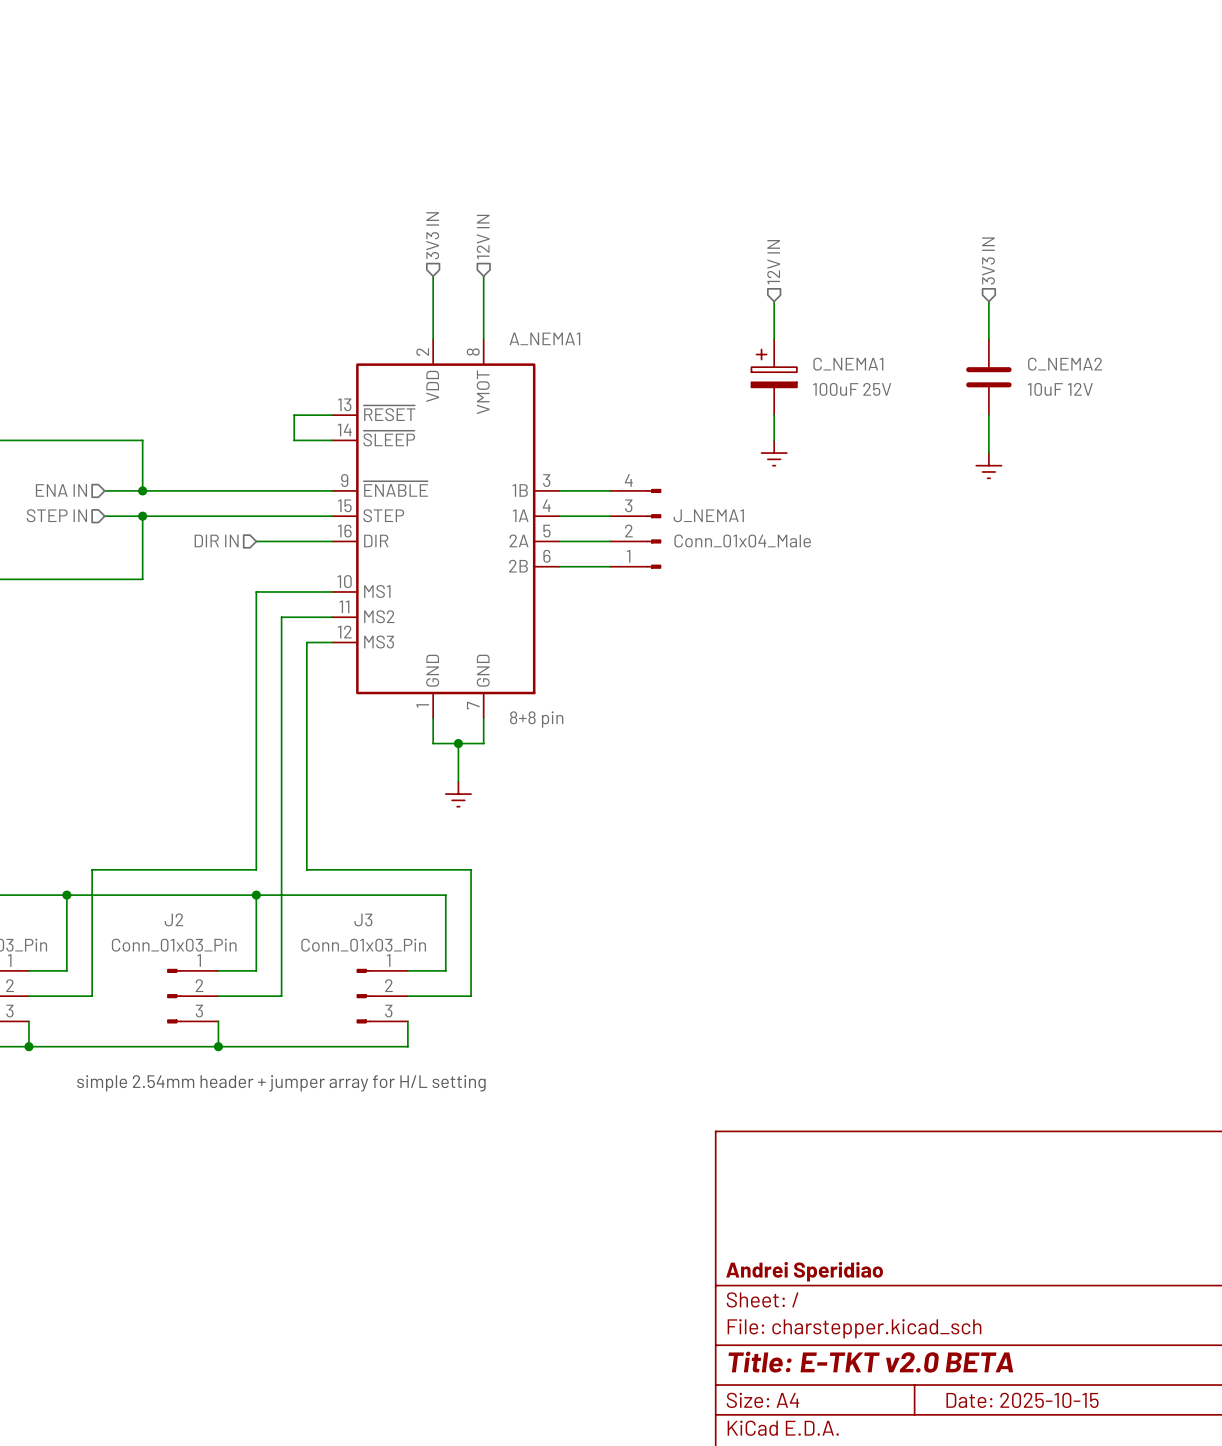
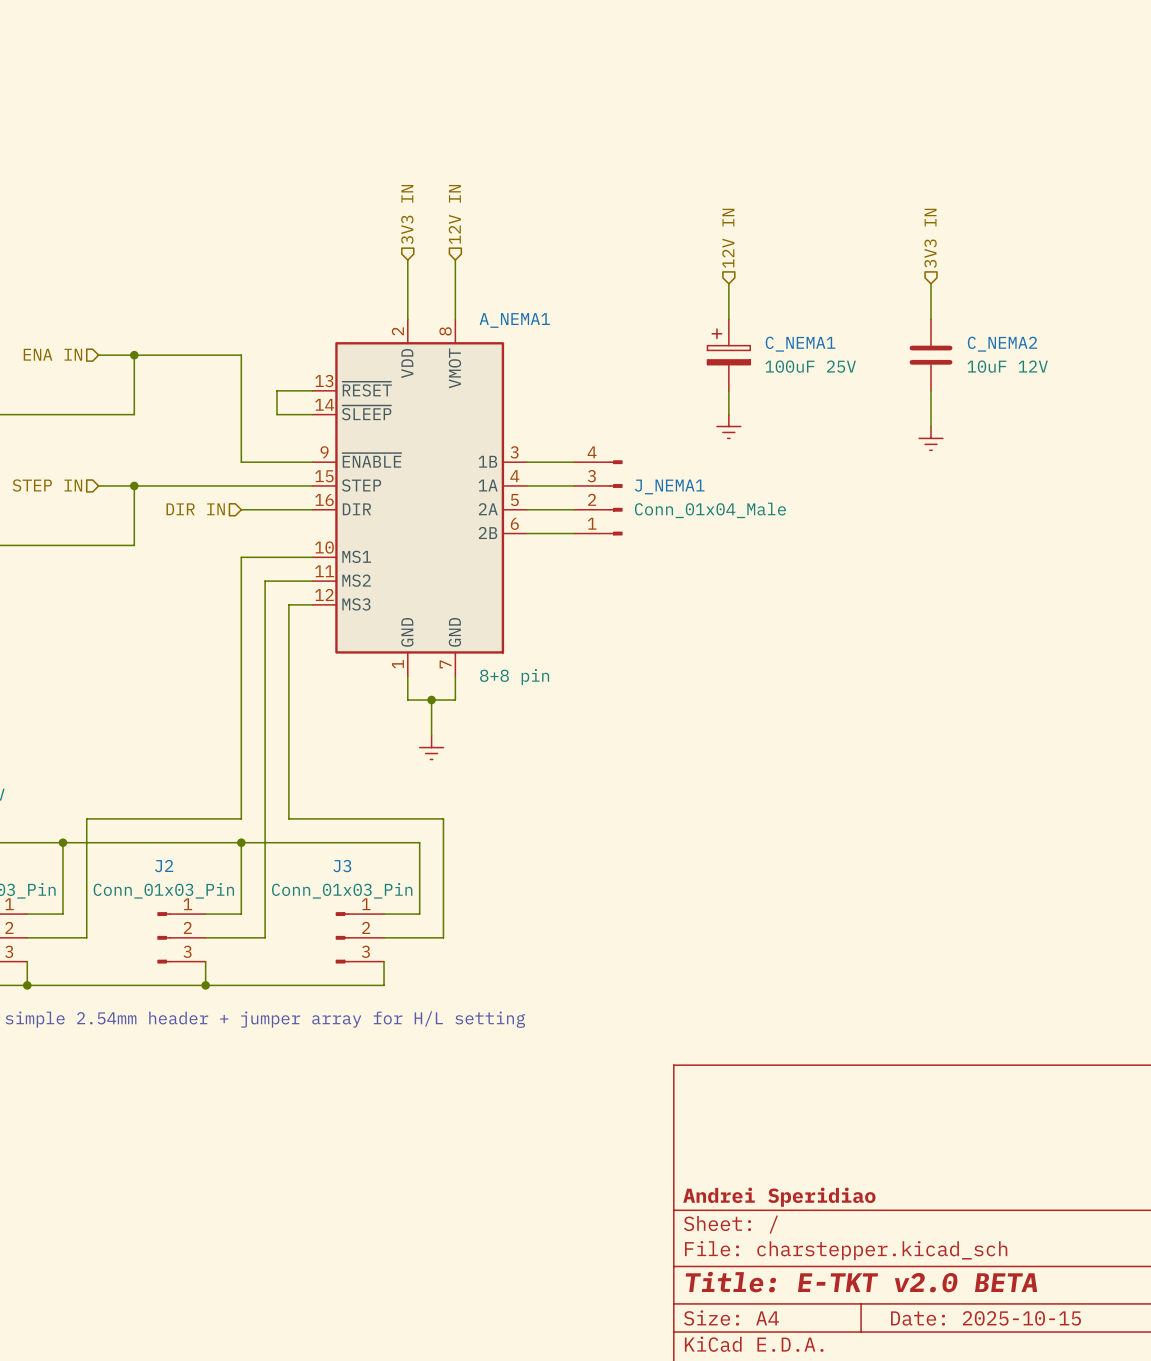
junction: none -> (134, 355)
wire: (142, 440) (142, 490) -> (134, 414) (134, 355)
hierarchical label position: ENA IN (61, 490) -> ENA IN (52, 354)
wire: (104, 490) (256, 490) -> (98, 355) (241, 355) (241, 462)
junction: (142, 490) -> none

